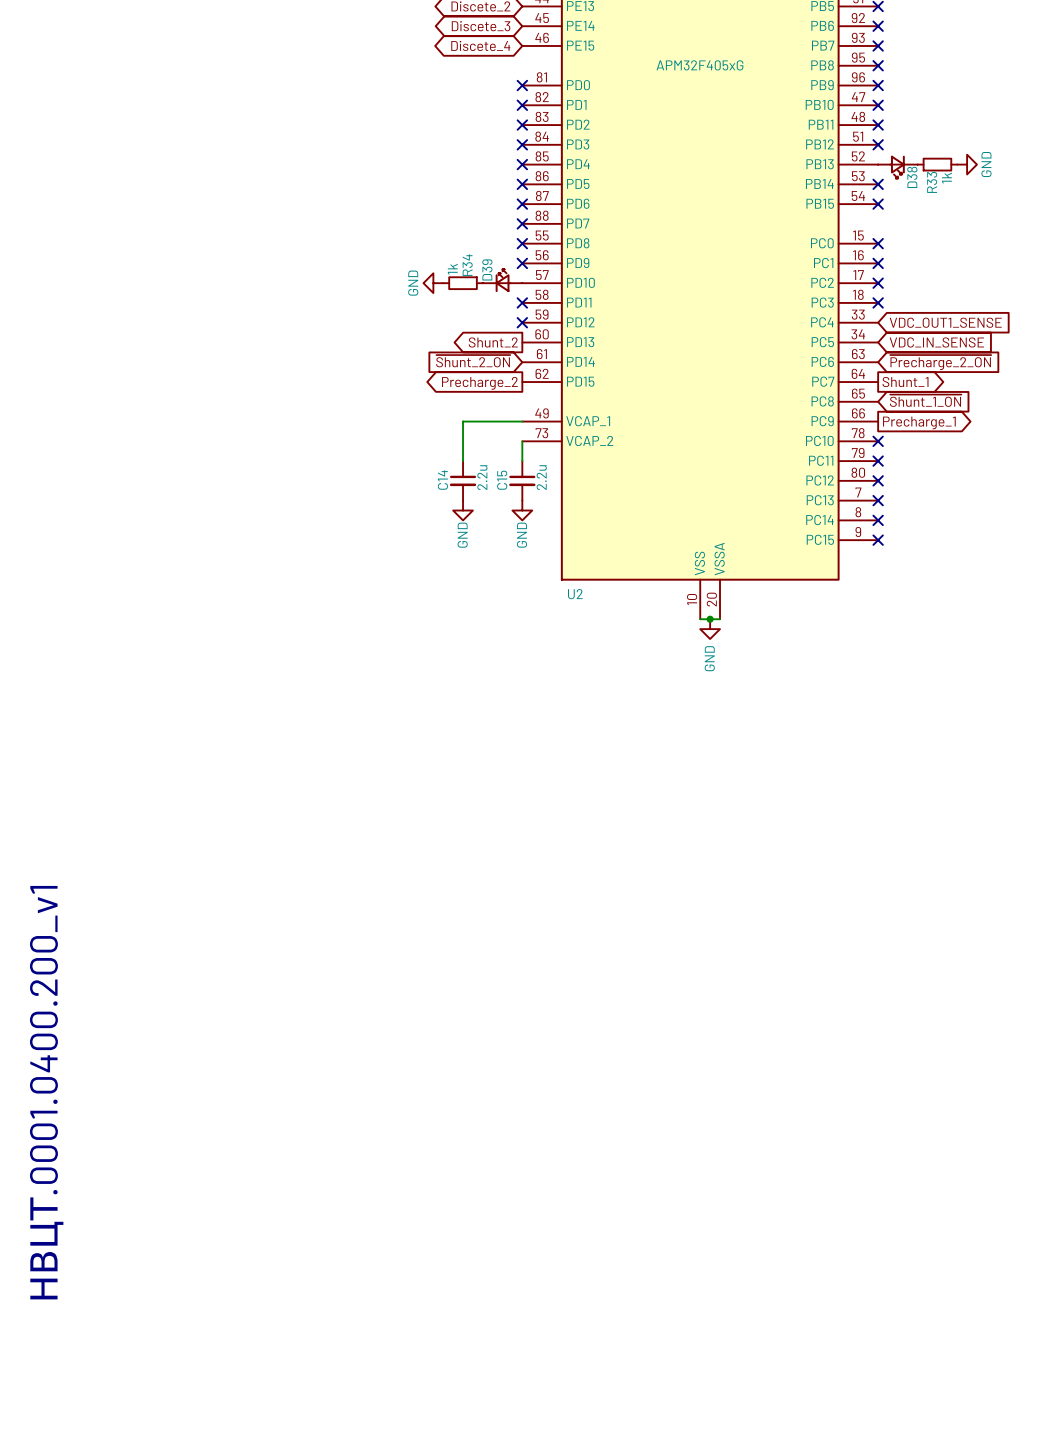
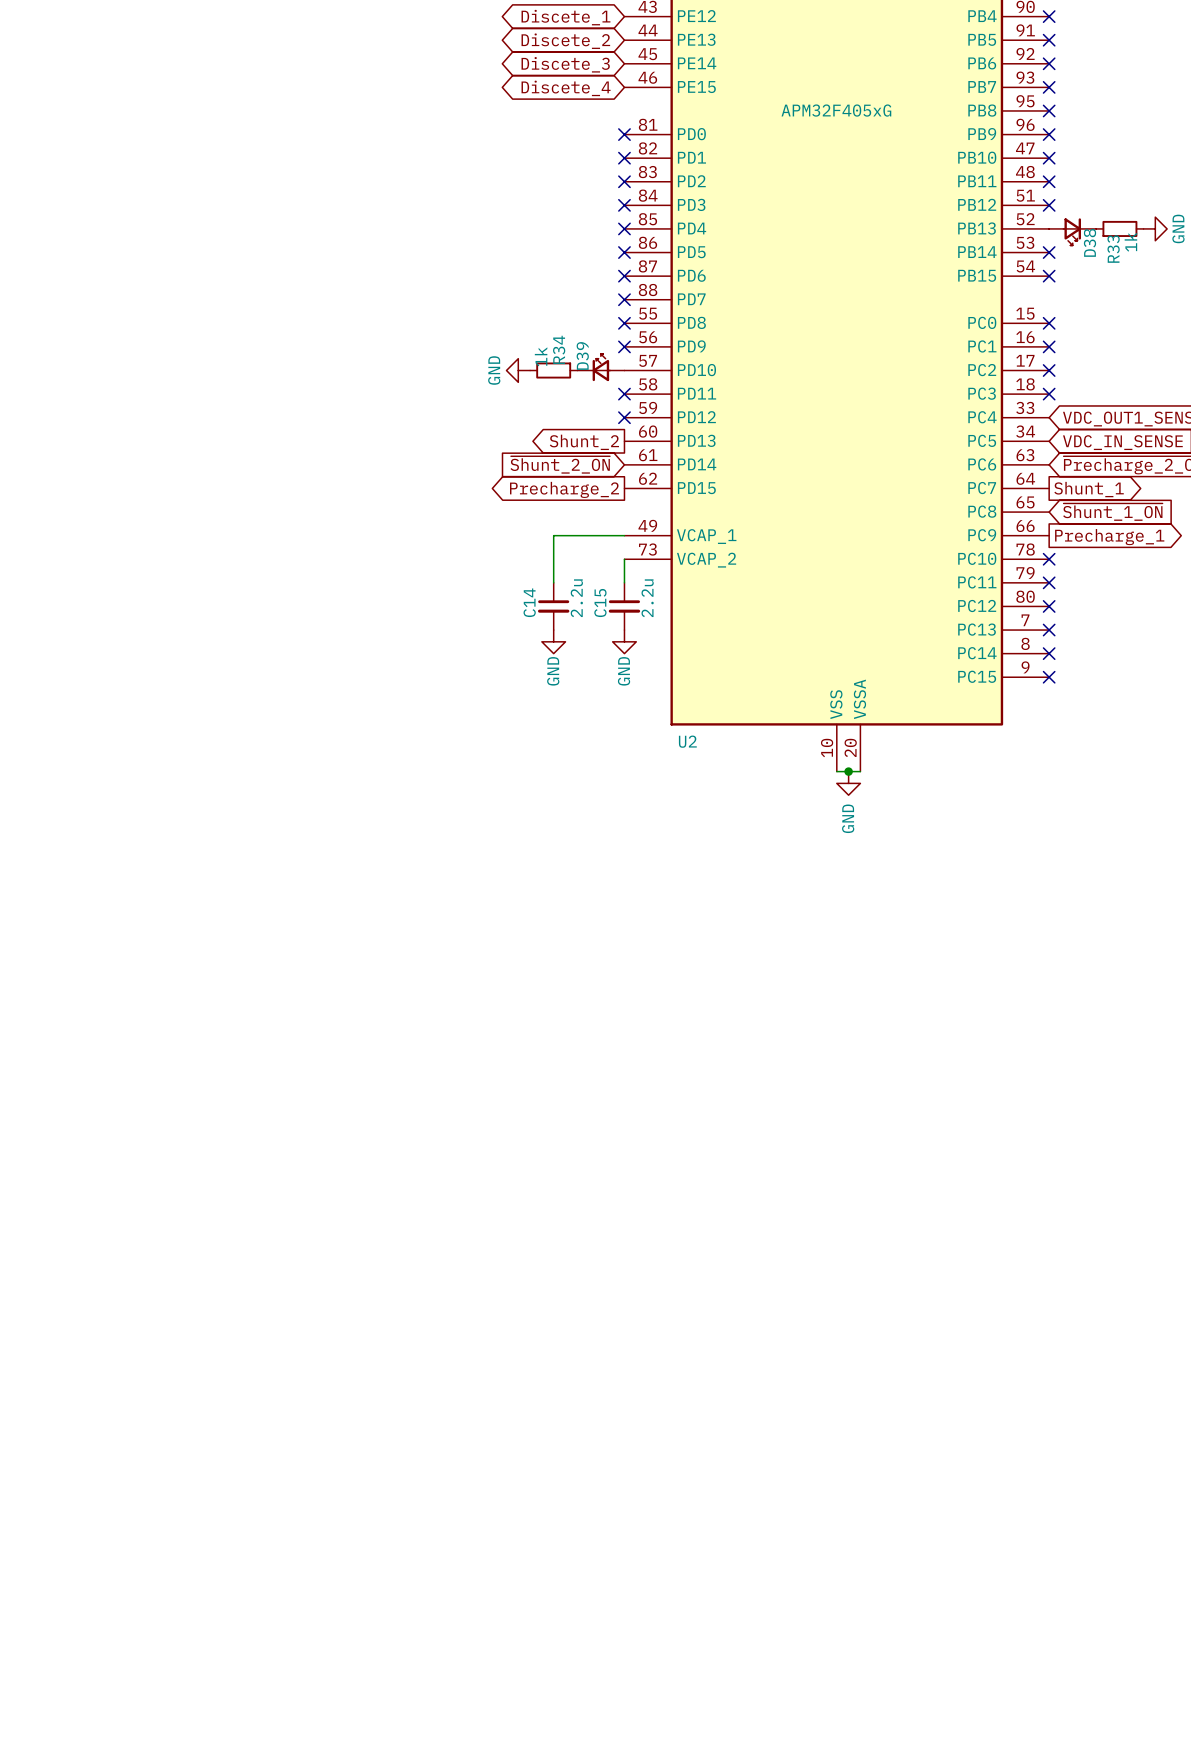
text: НВЦТ.0001.0400.200_v1 (46, 1092) -> none

